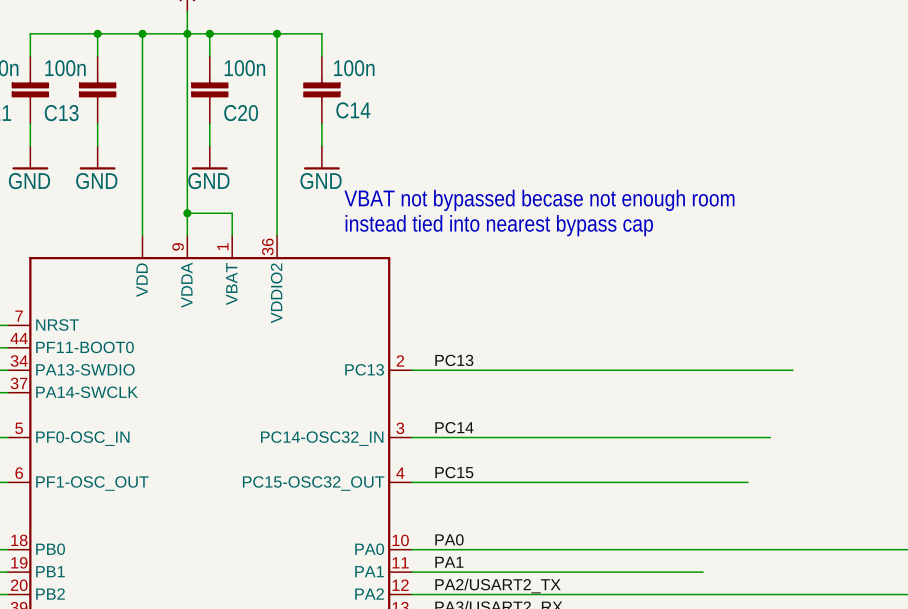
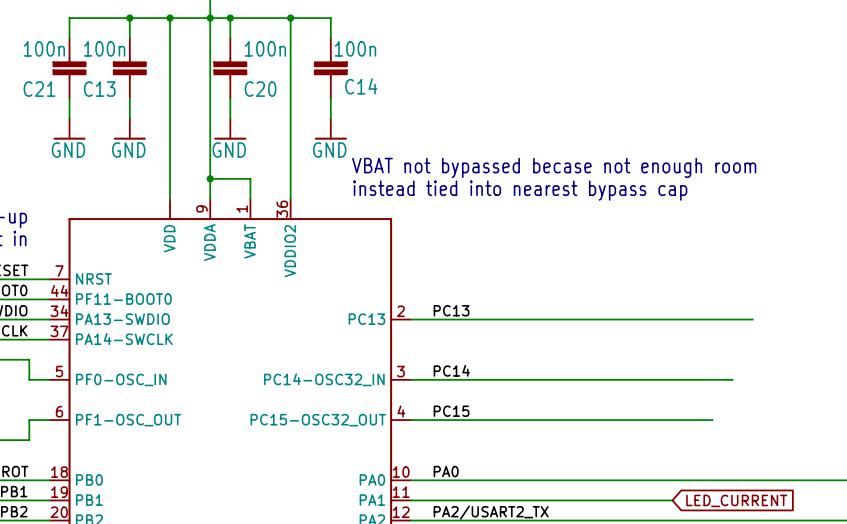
label: PA1 (449, 562) -> none
global label: none -> LED_CURRENT (736, 500)

